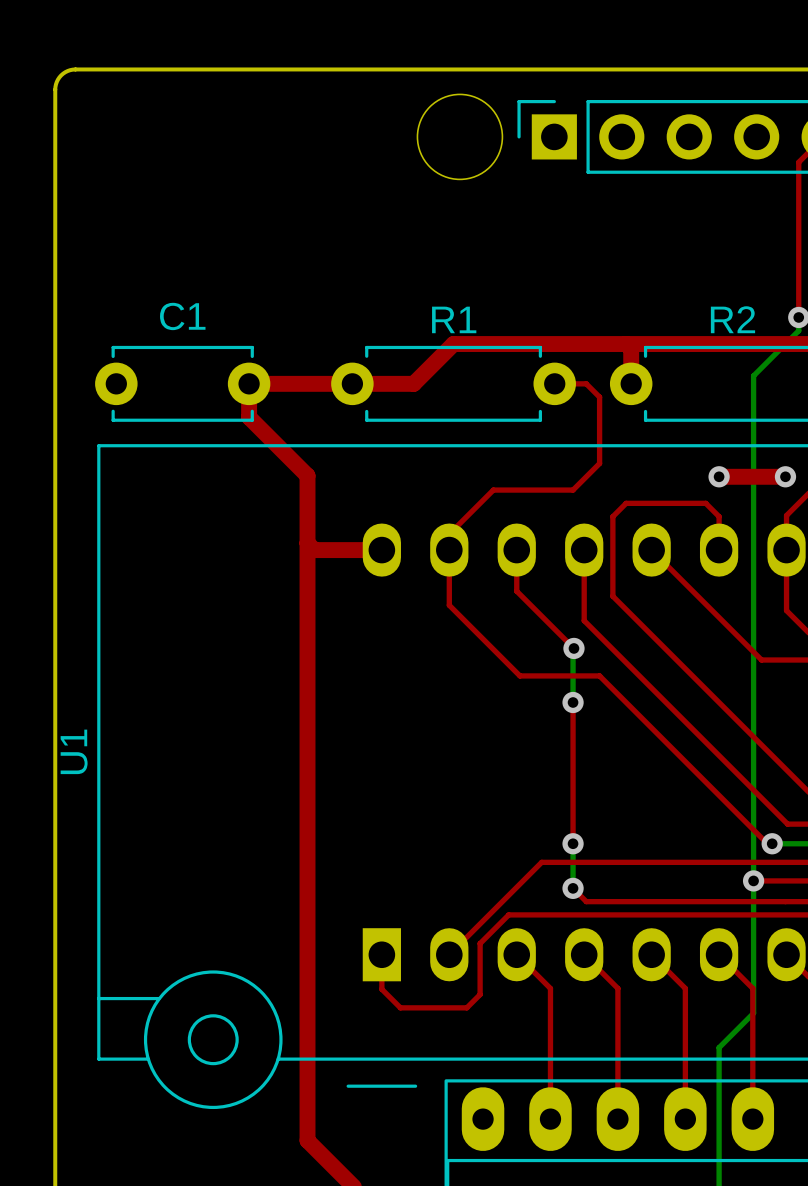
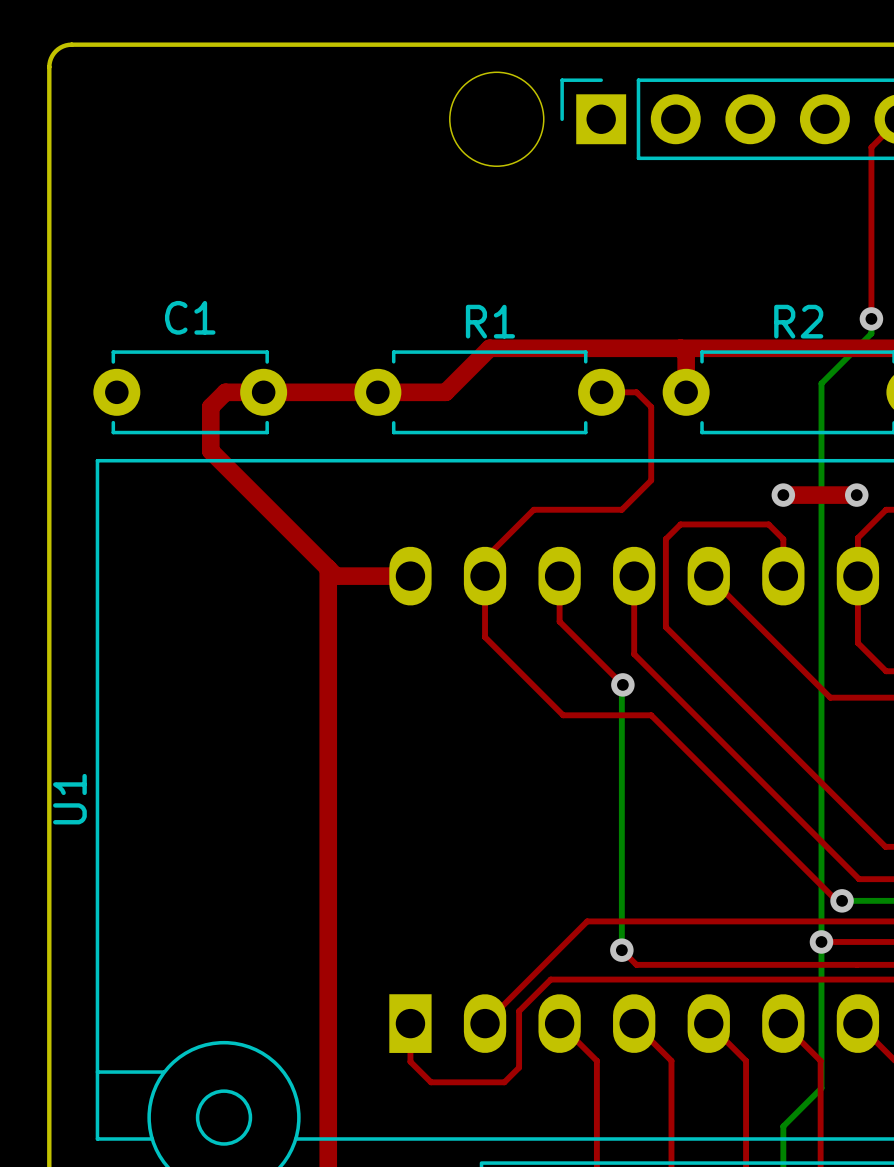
top track: (249, 383) (249, 417) (307, 475) (307, 543) -> (263, 392) (225, 392) (210, 407) (210, 451) (328, 568)
top track: (573, 702) (573, 843) -> none
bottom track: none -> (621, 744) (621, 900)
via: (573, 702) -> none
via: (573, 843) -> none

